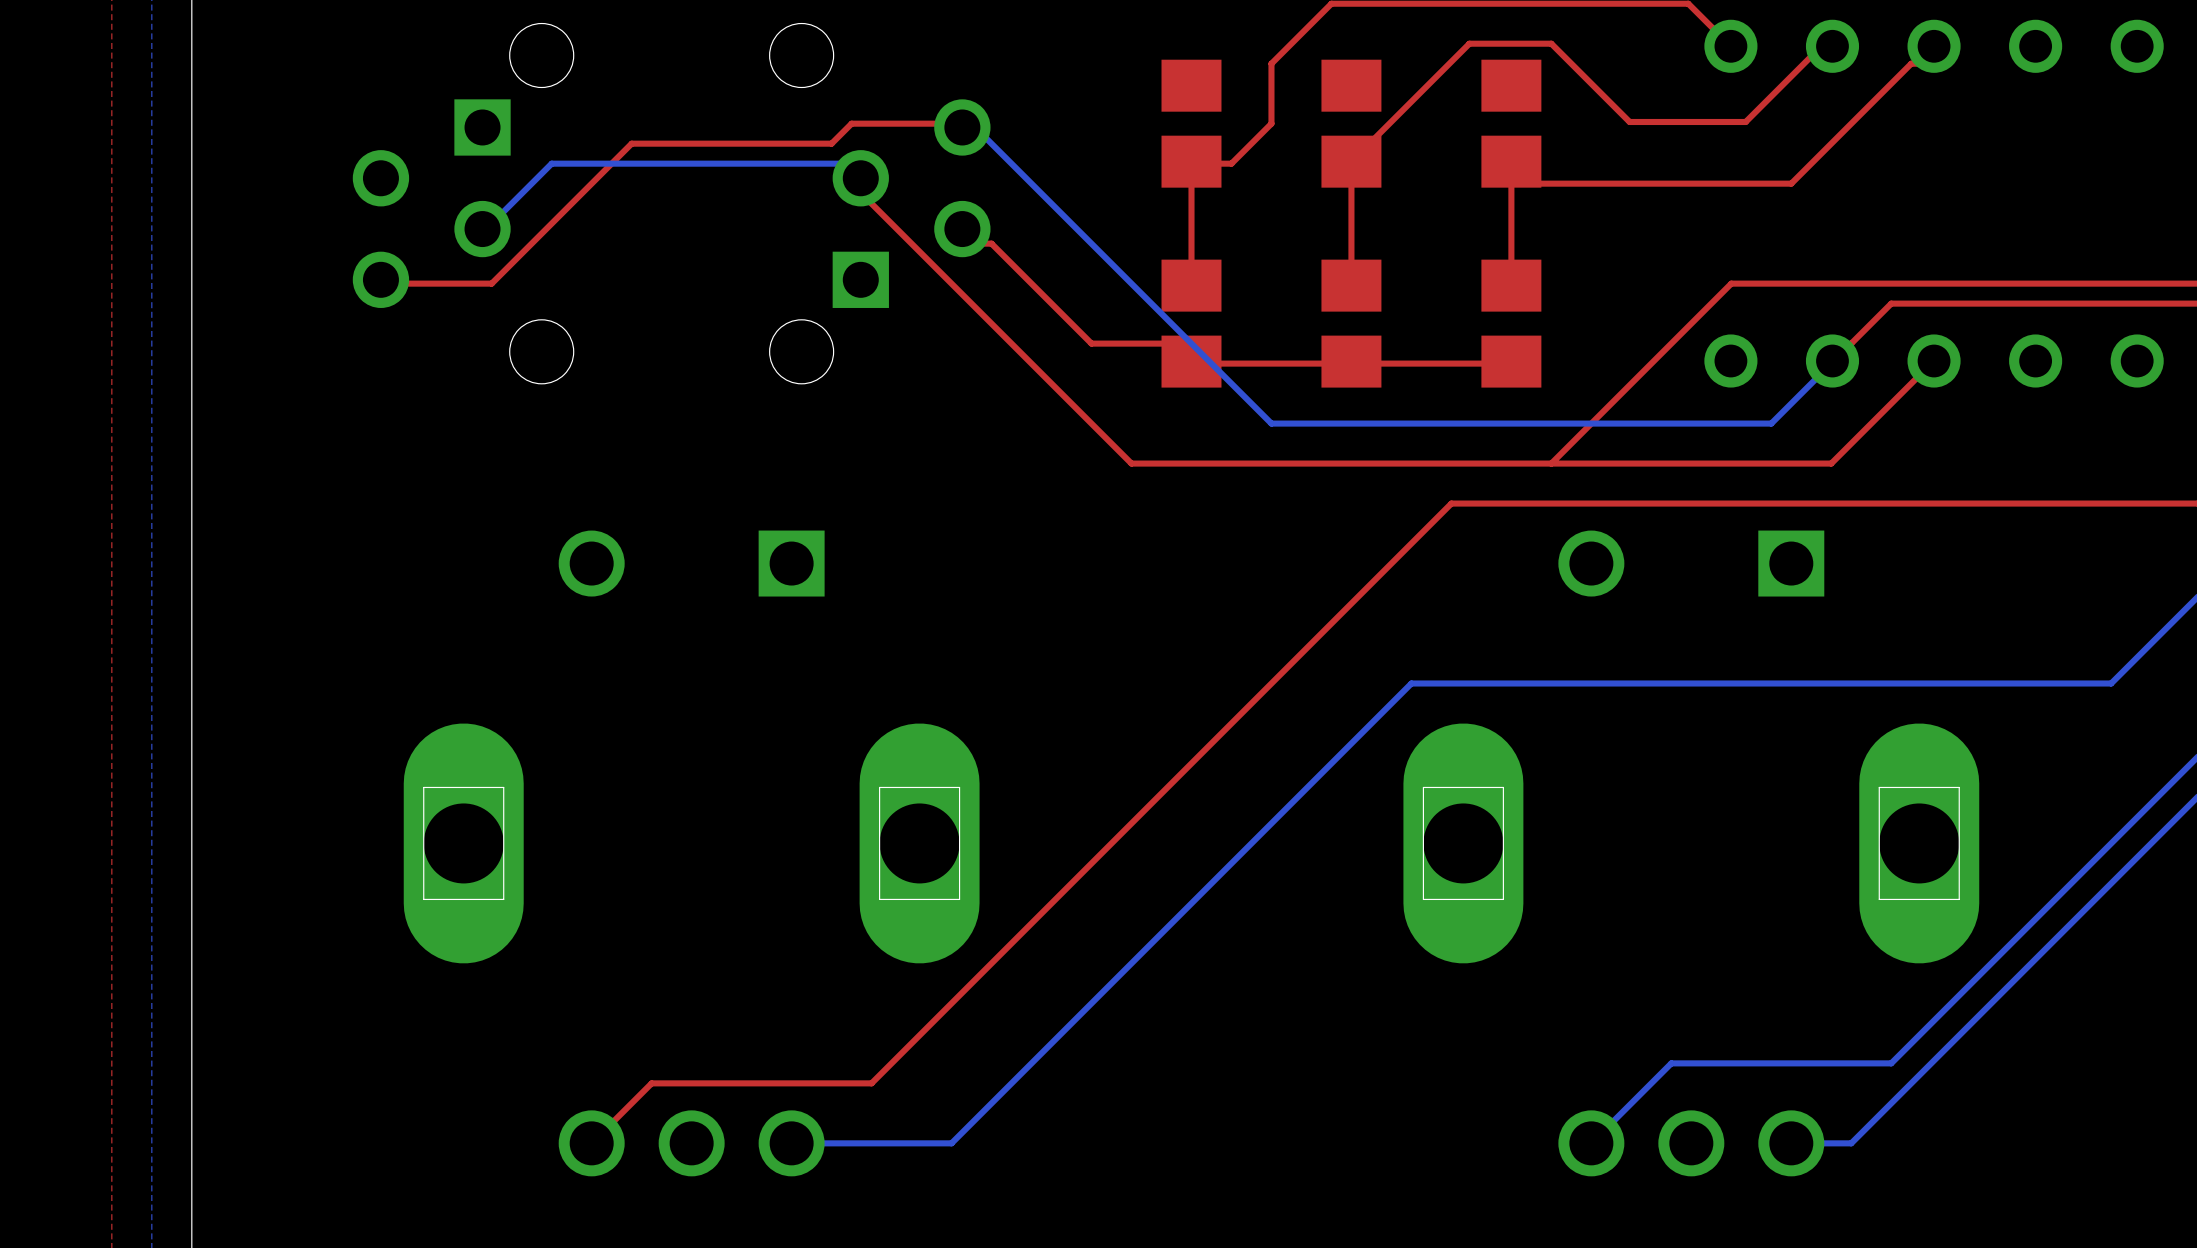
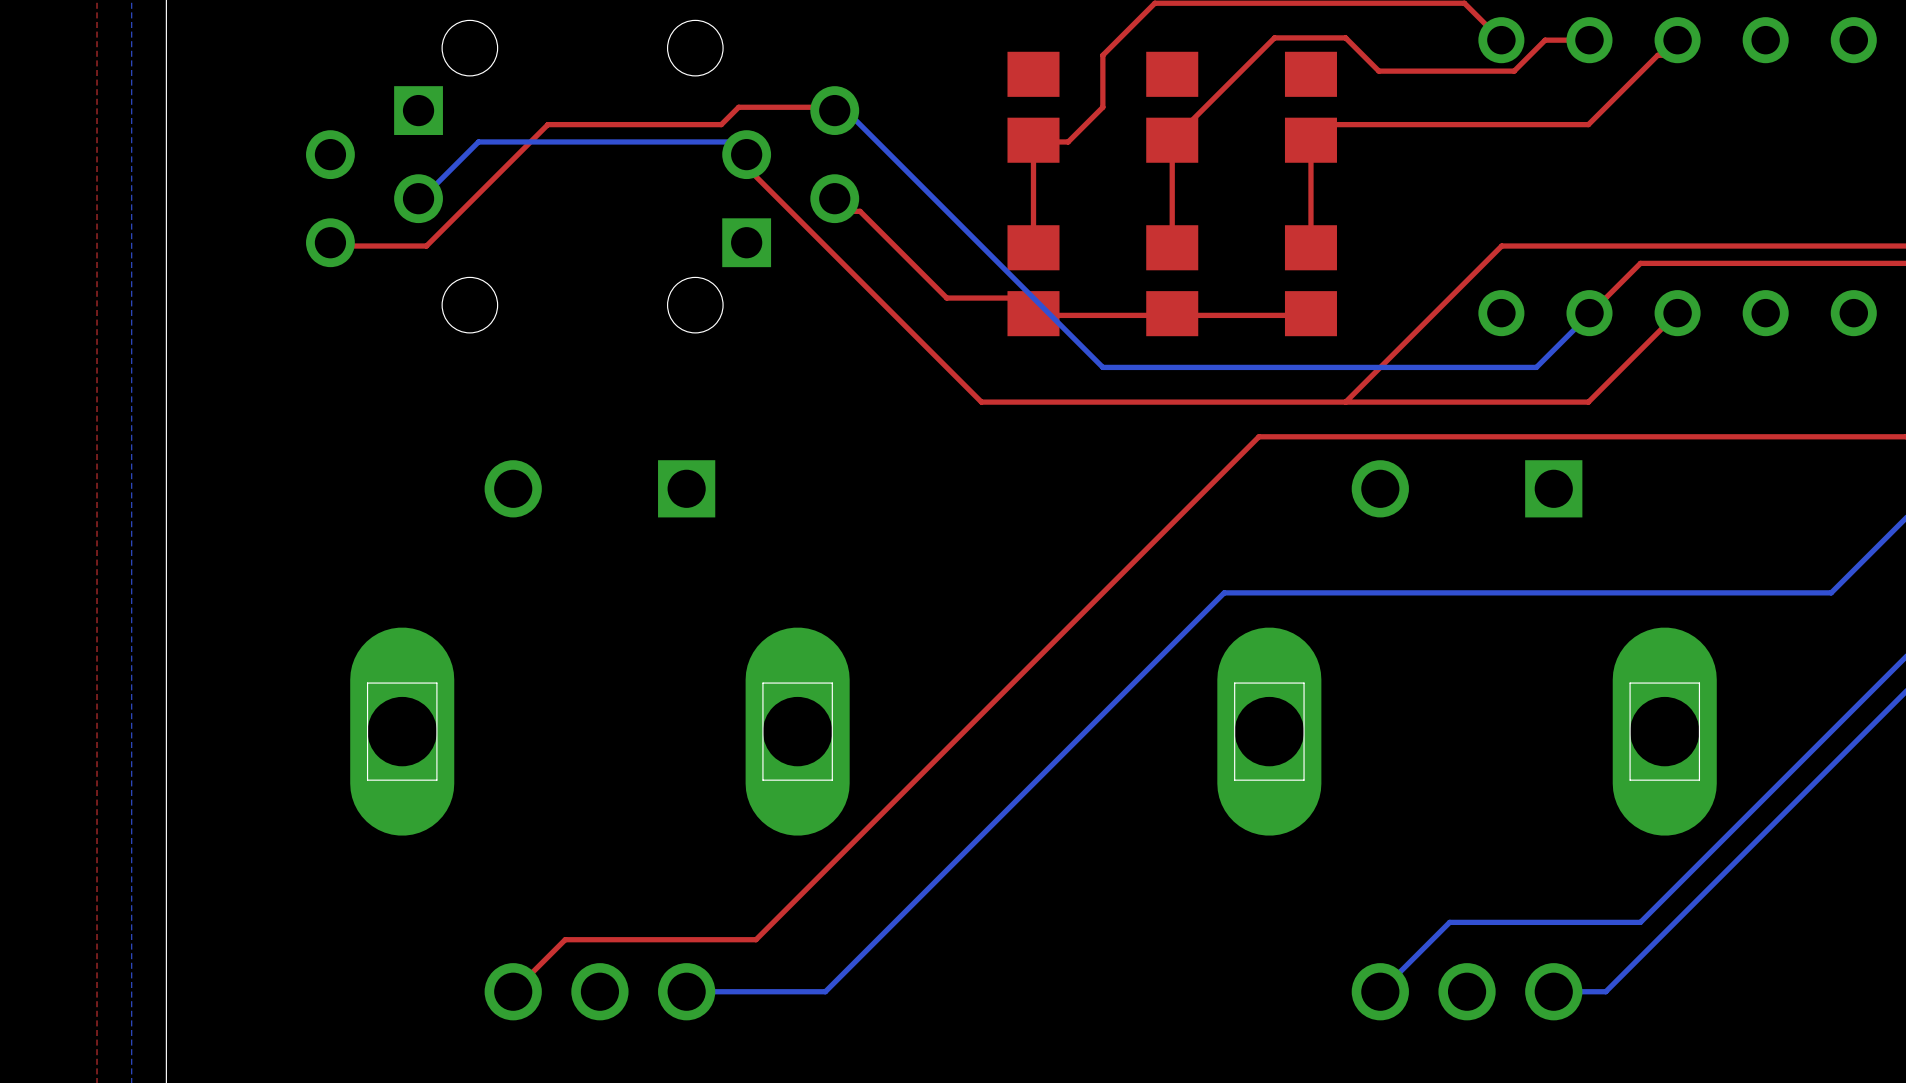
top track: (1821, 46) (1745, 121) (1629, 121) (1589, 82) -> (1579, 40) (1545, 40) (1514, 71) (1378, 71)
top track: (1831, 143) (1791, 183) (1533, 183) (1511, 161) -> (1588, 124) (1310, 124) (1310, 140)

